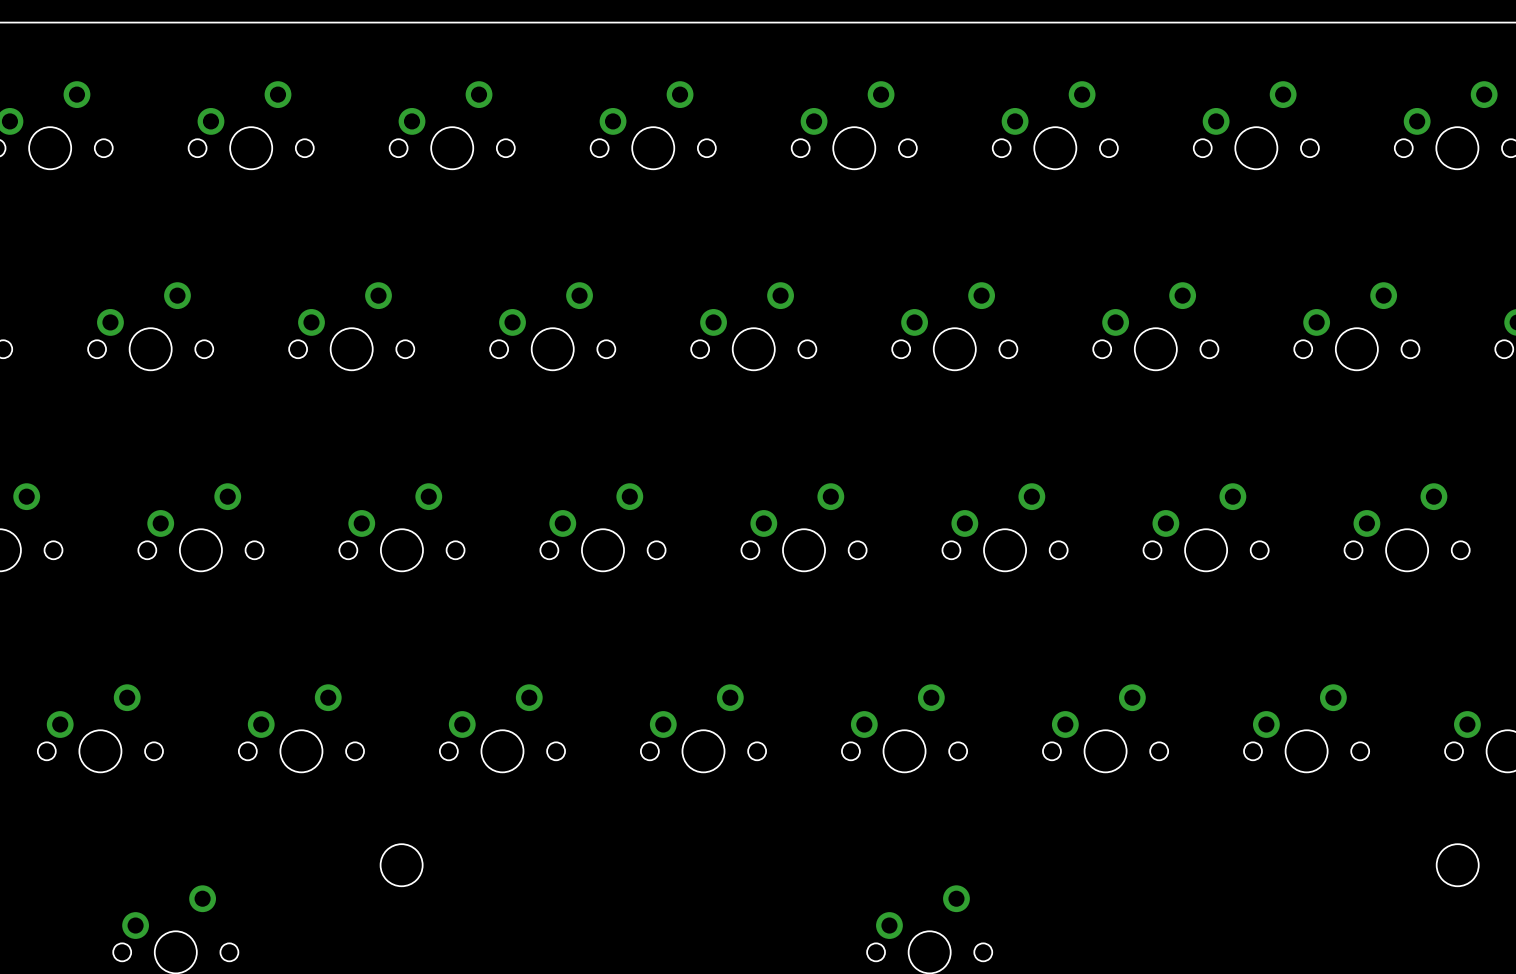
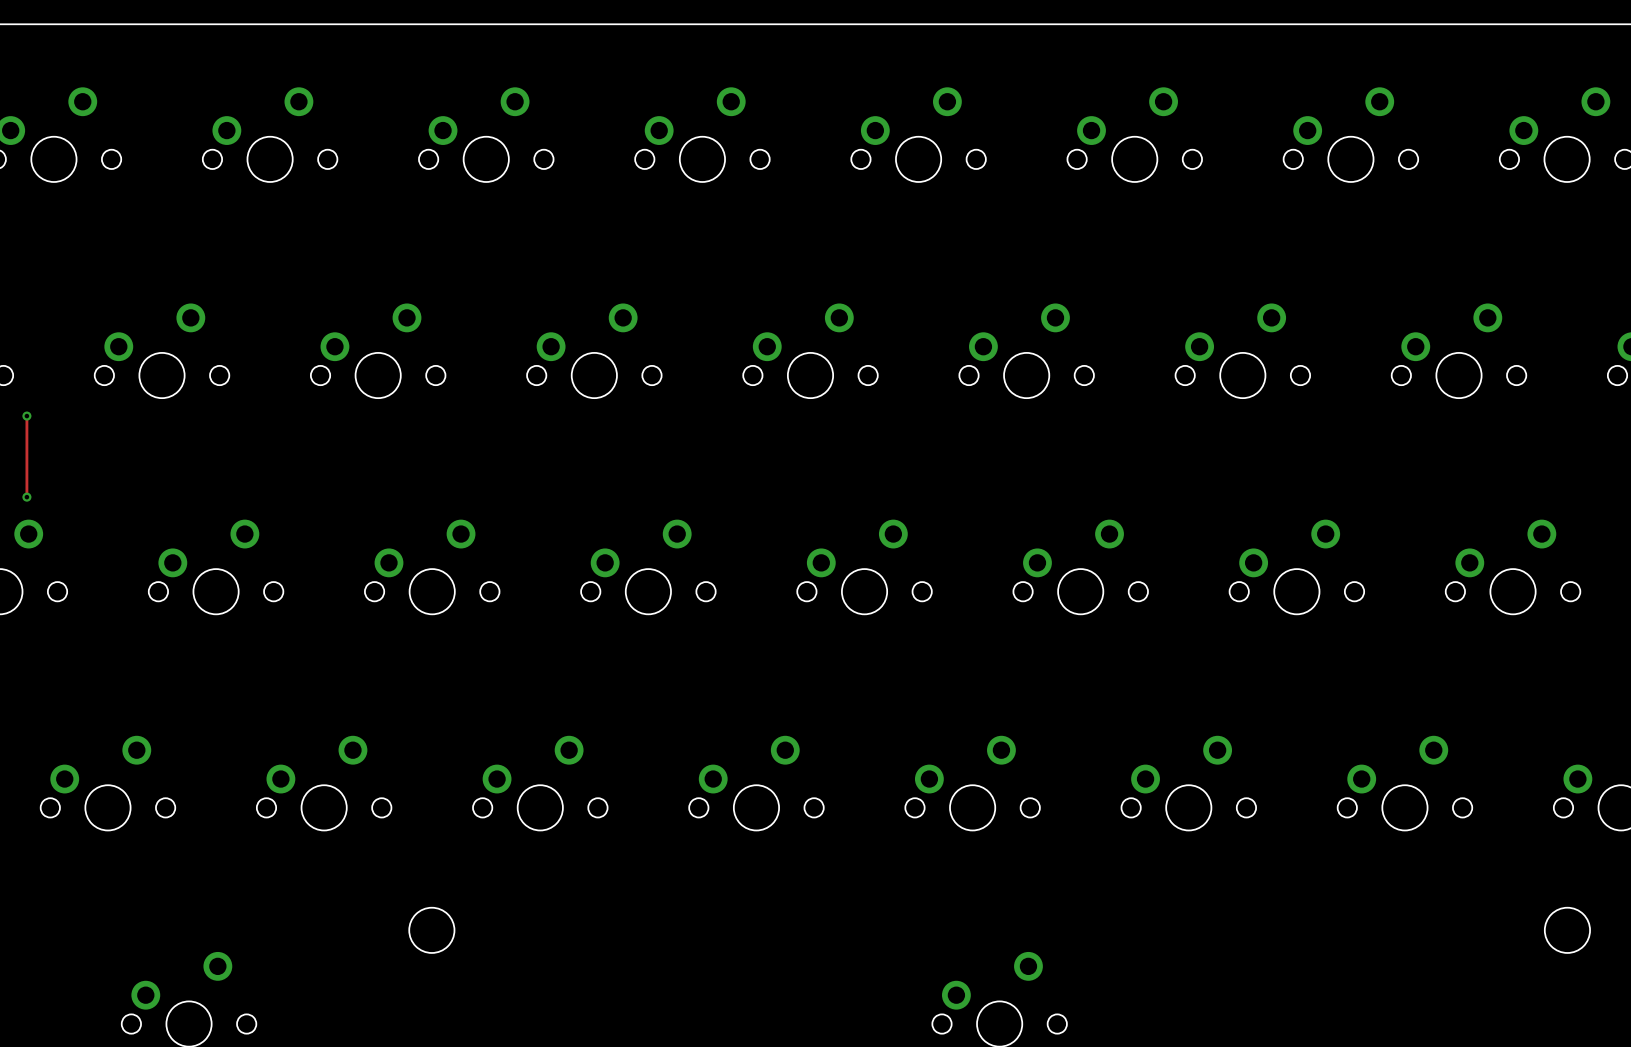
track: none -> (26, 416) (26, 497)
via: none -> (26, 416)
via: none -> (26, 497)

